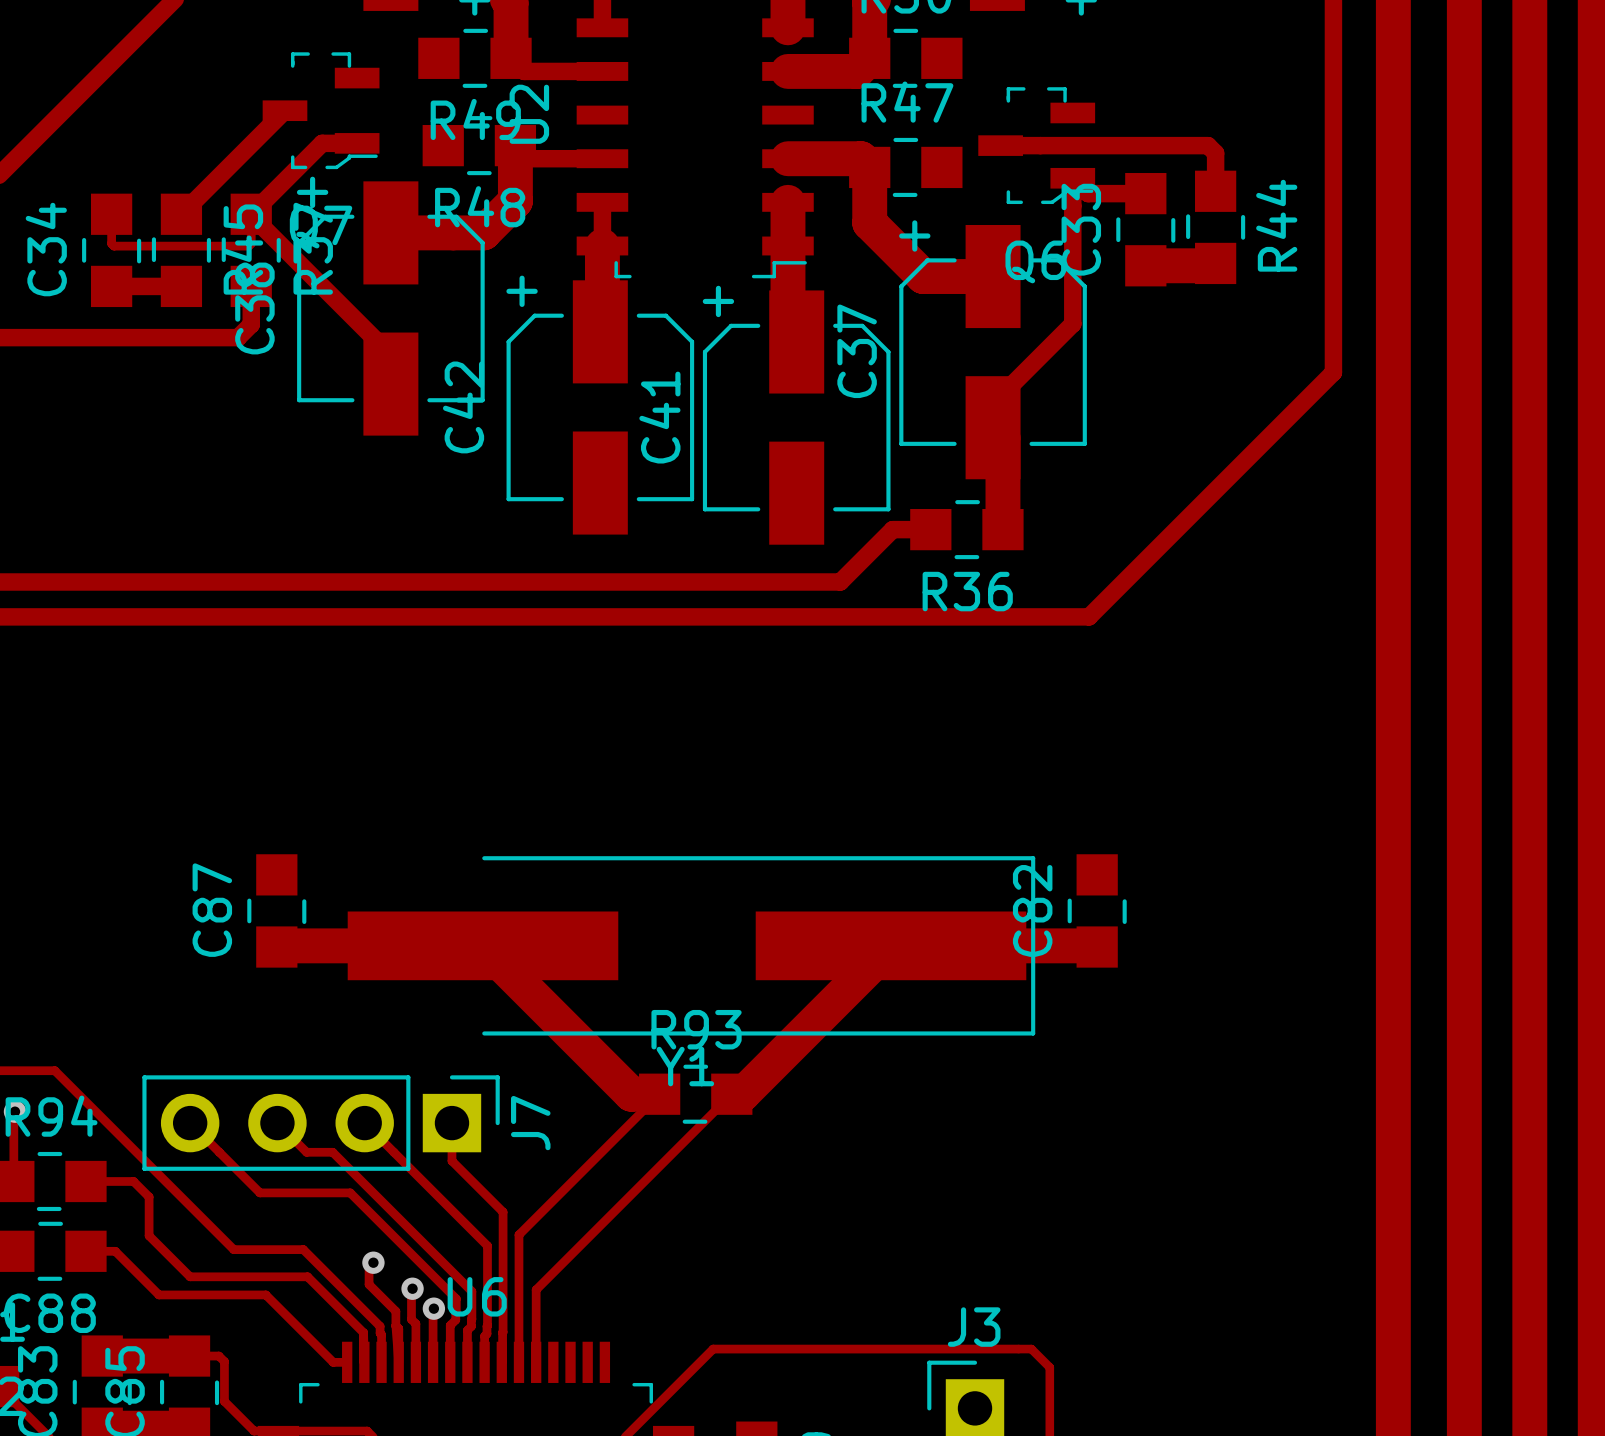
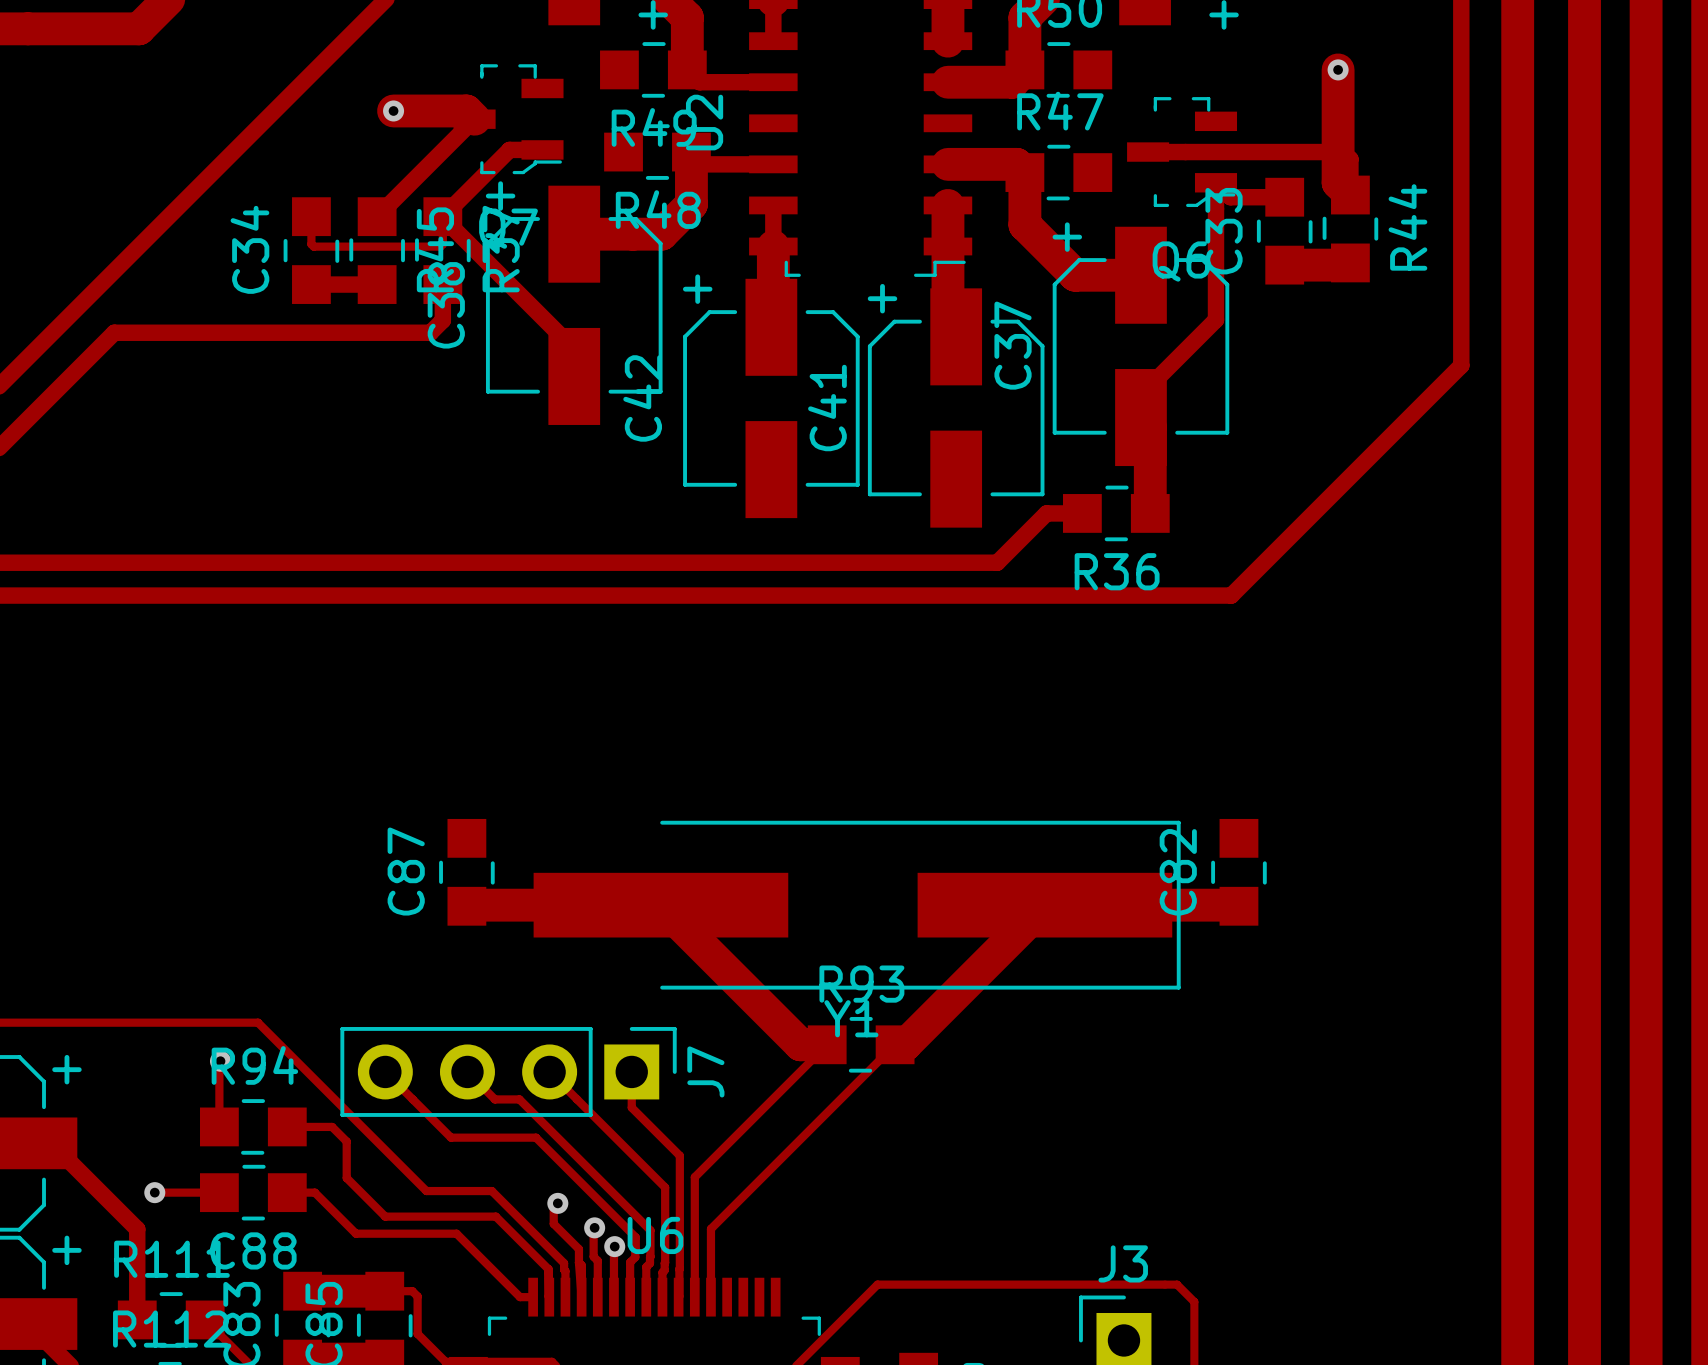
track: none -> (1338, 69) (1338, 182) (1350, 195)
via: none -> (1338, 69)
track: none -> (393, 110) (466, 110) (474, 119)
via: none -> (393, 110)

